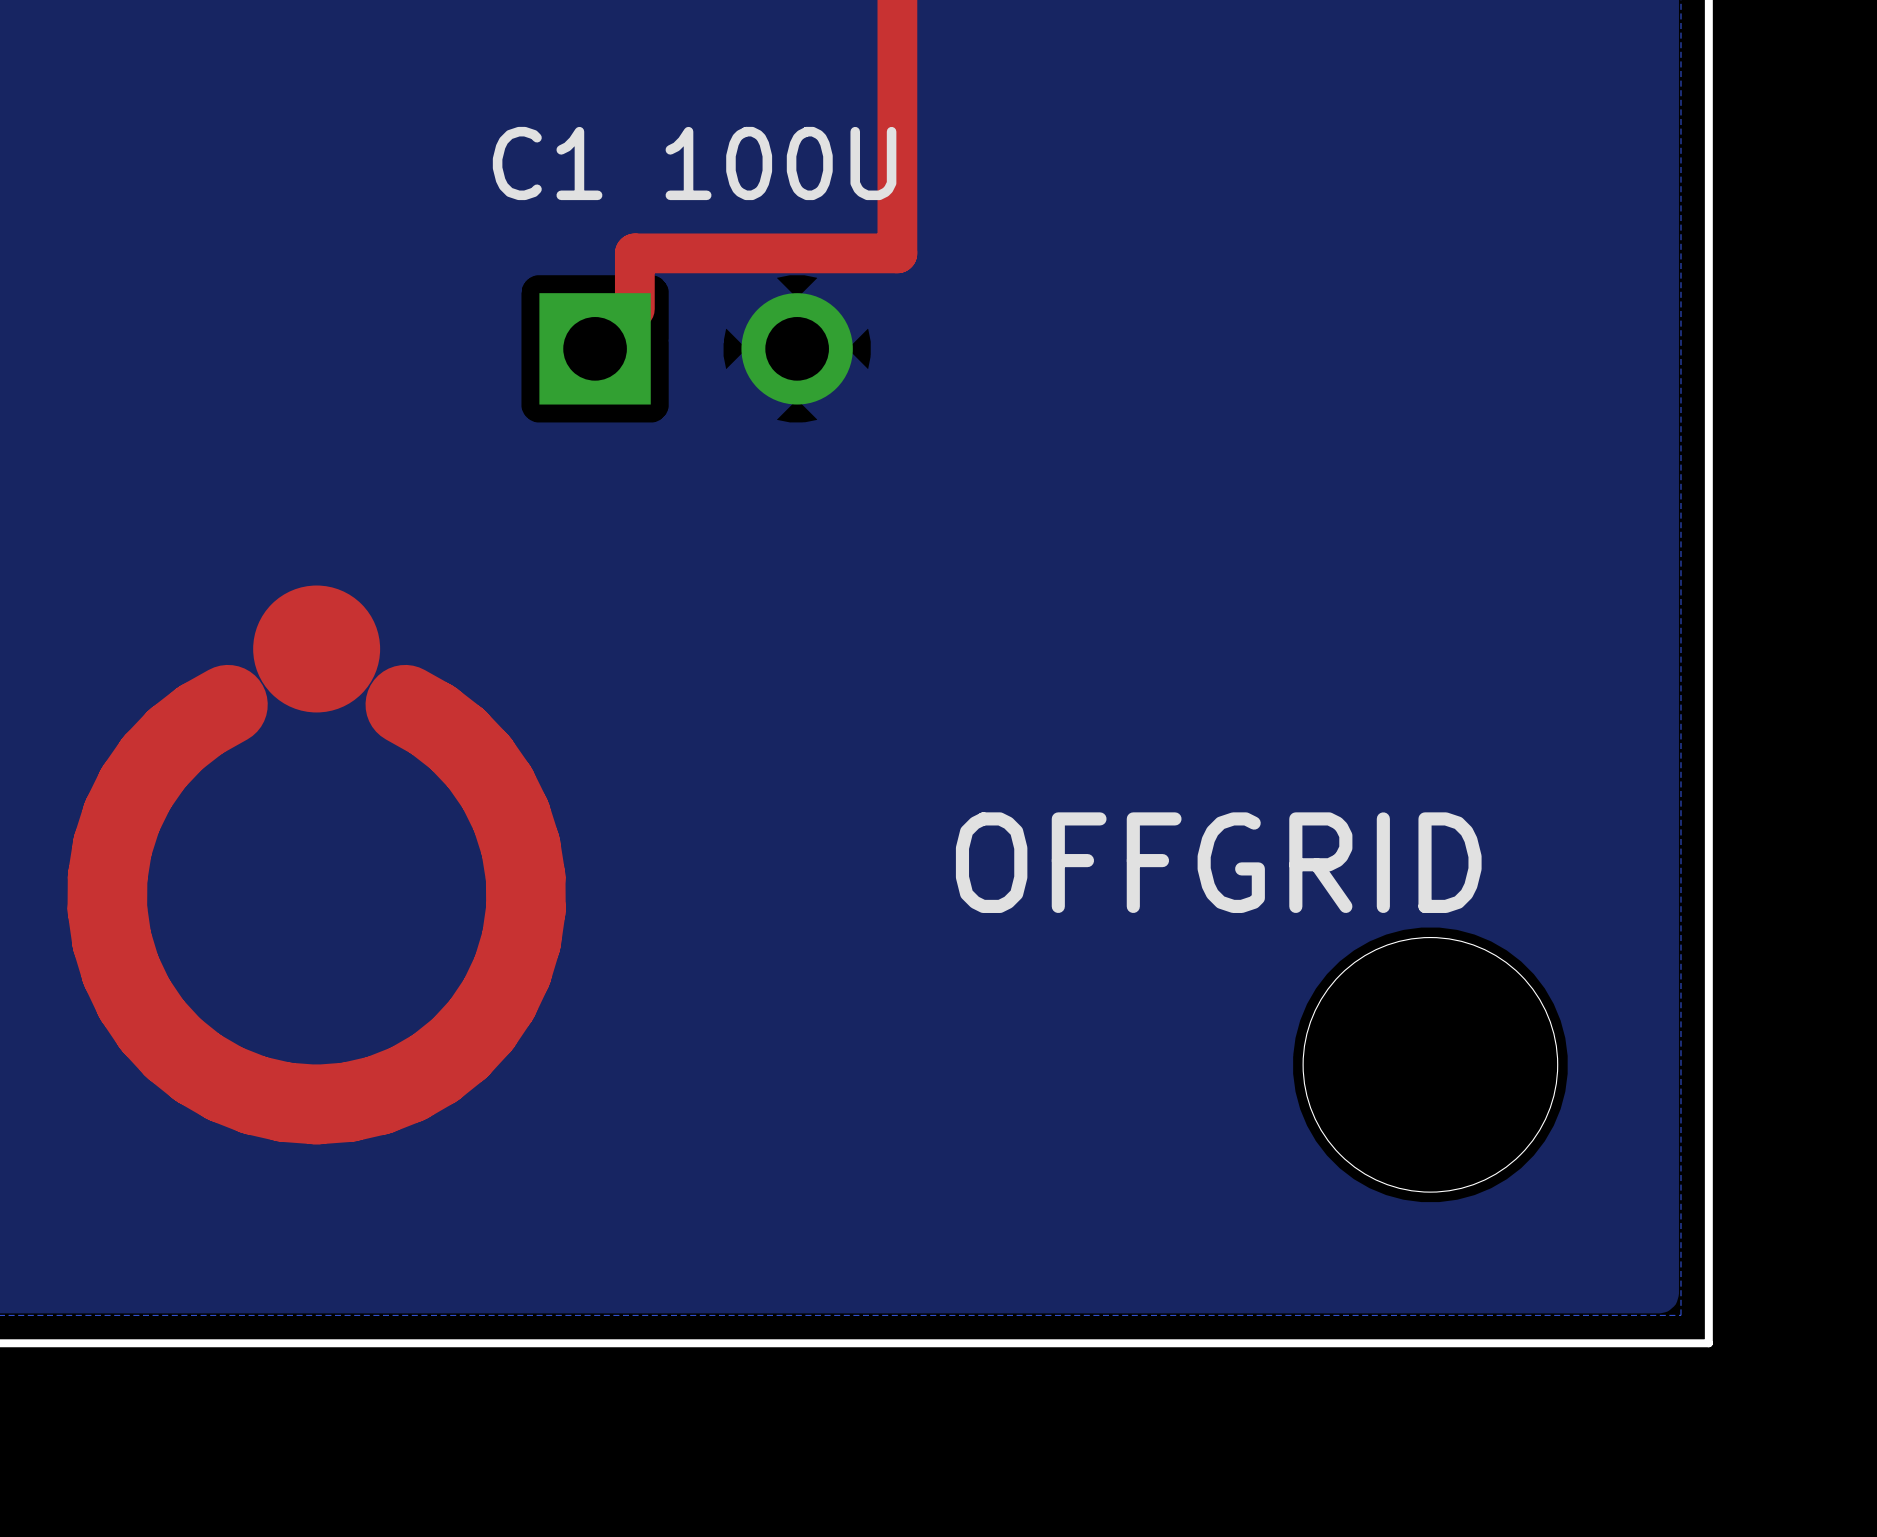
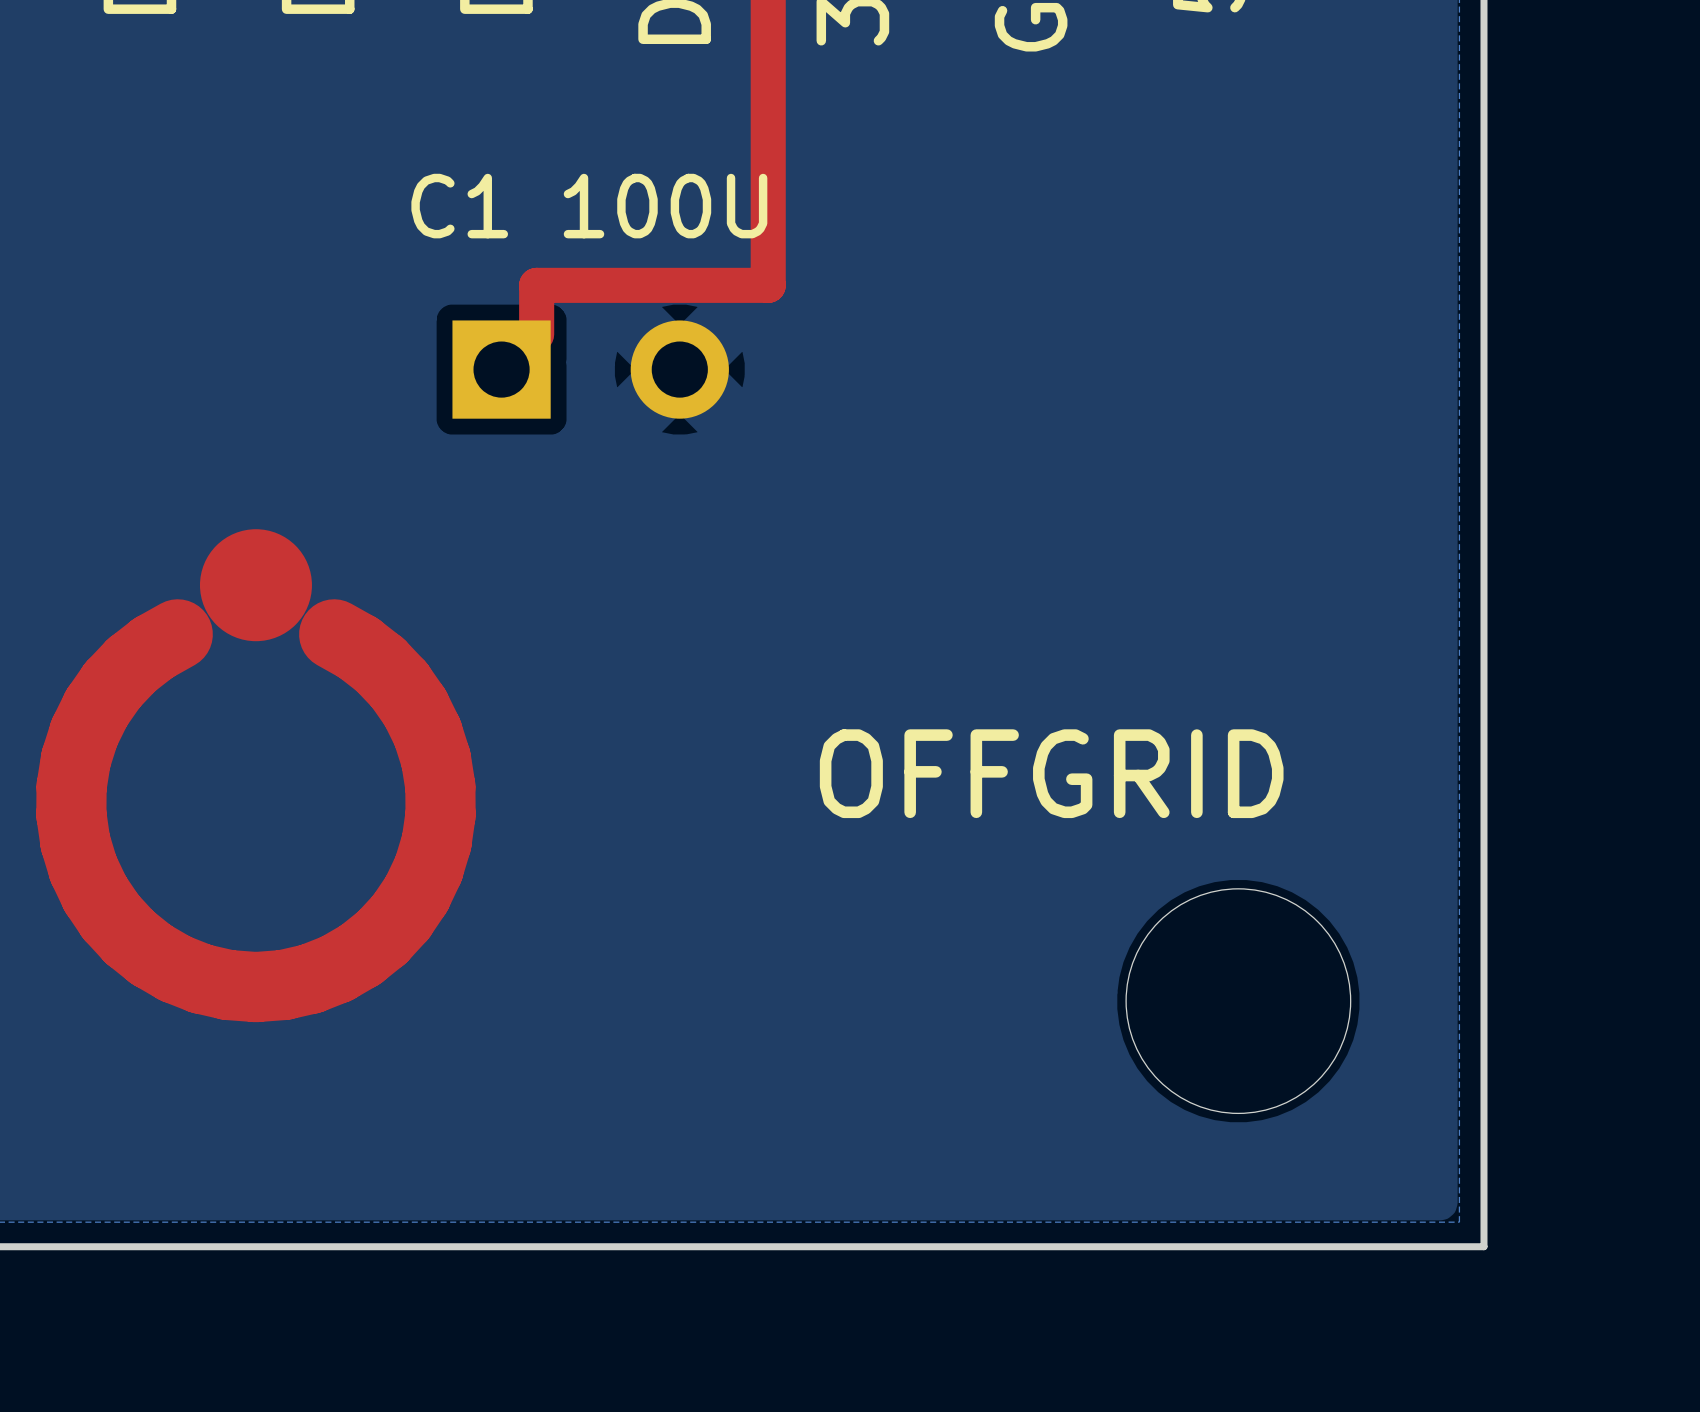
drawing position: (316, 648) -> (255, 585)
top track: (227, 704) (200, 720) (175, 739) (154, 762) (136, 788) (122, 816) (112, 846) (107, 877) (107, 909) (111, 940) (120, 970) (134, 998) (152, 1024) (173, 1048) (197, 1067) (225, 1083) (254, 1095) (285, 1102) (316, 1104) (348, 1102) (378, 1095) (408, 1083) (435, 1067) (459, 1048) (481, 1024) (498, 998) (512, 970) (521, 940) (525, 909) (525, 877) (520, 846) (511, 816) (497, 788) (479, 762) (457, 739) (432, 720) (405, 704) -> (177, 634) (153, 647) (131, 665) (112, 685) (96, 707) (84, 732) (75, 759) (71, 786) (71, 814) (75, 842) (83, 868) (95, 893) (110, 916) (129, 937) (151, 954) (175, 968) (201, 978) (228, 984) (255, 987) (283, 984) (310, 978) (336, 968) (360, 954) (382, 937) (401, 916) (416, 893) (428, 868) (436, 842) (440, 814) (440, 786) (436, 759) (427, 732) (415, 707) (399, 685) (380, 665) (358, 647) (334, 634)
text position: OFFGRID (1218, 862) -> OFFGRID (1051, 773)

